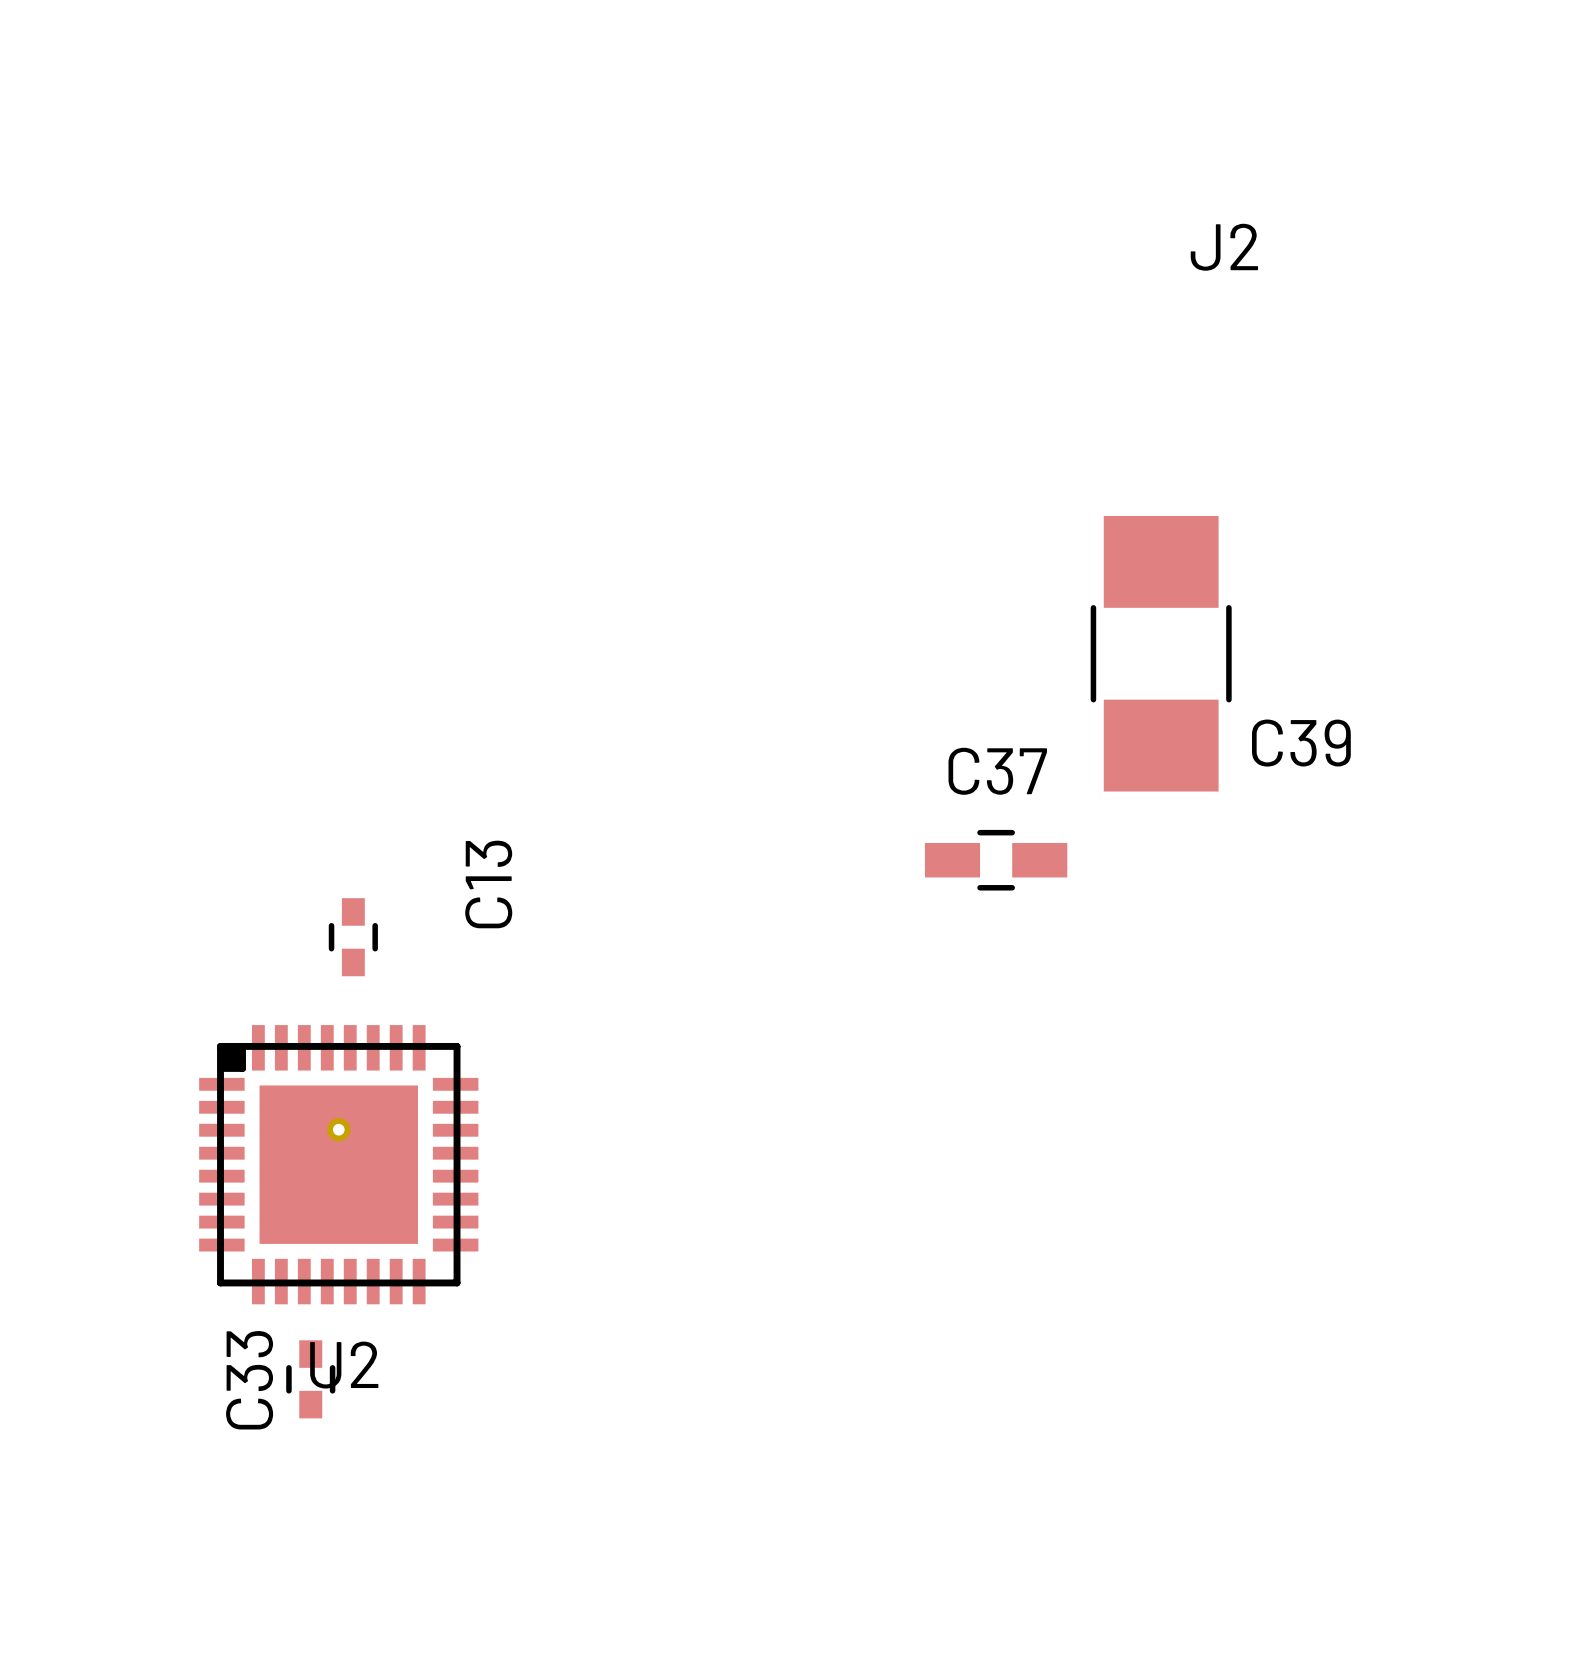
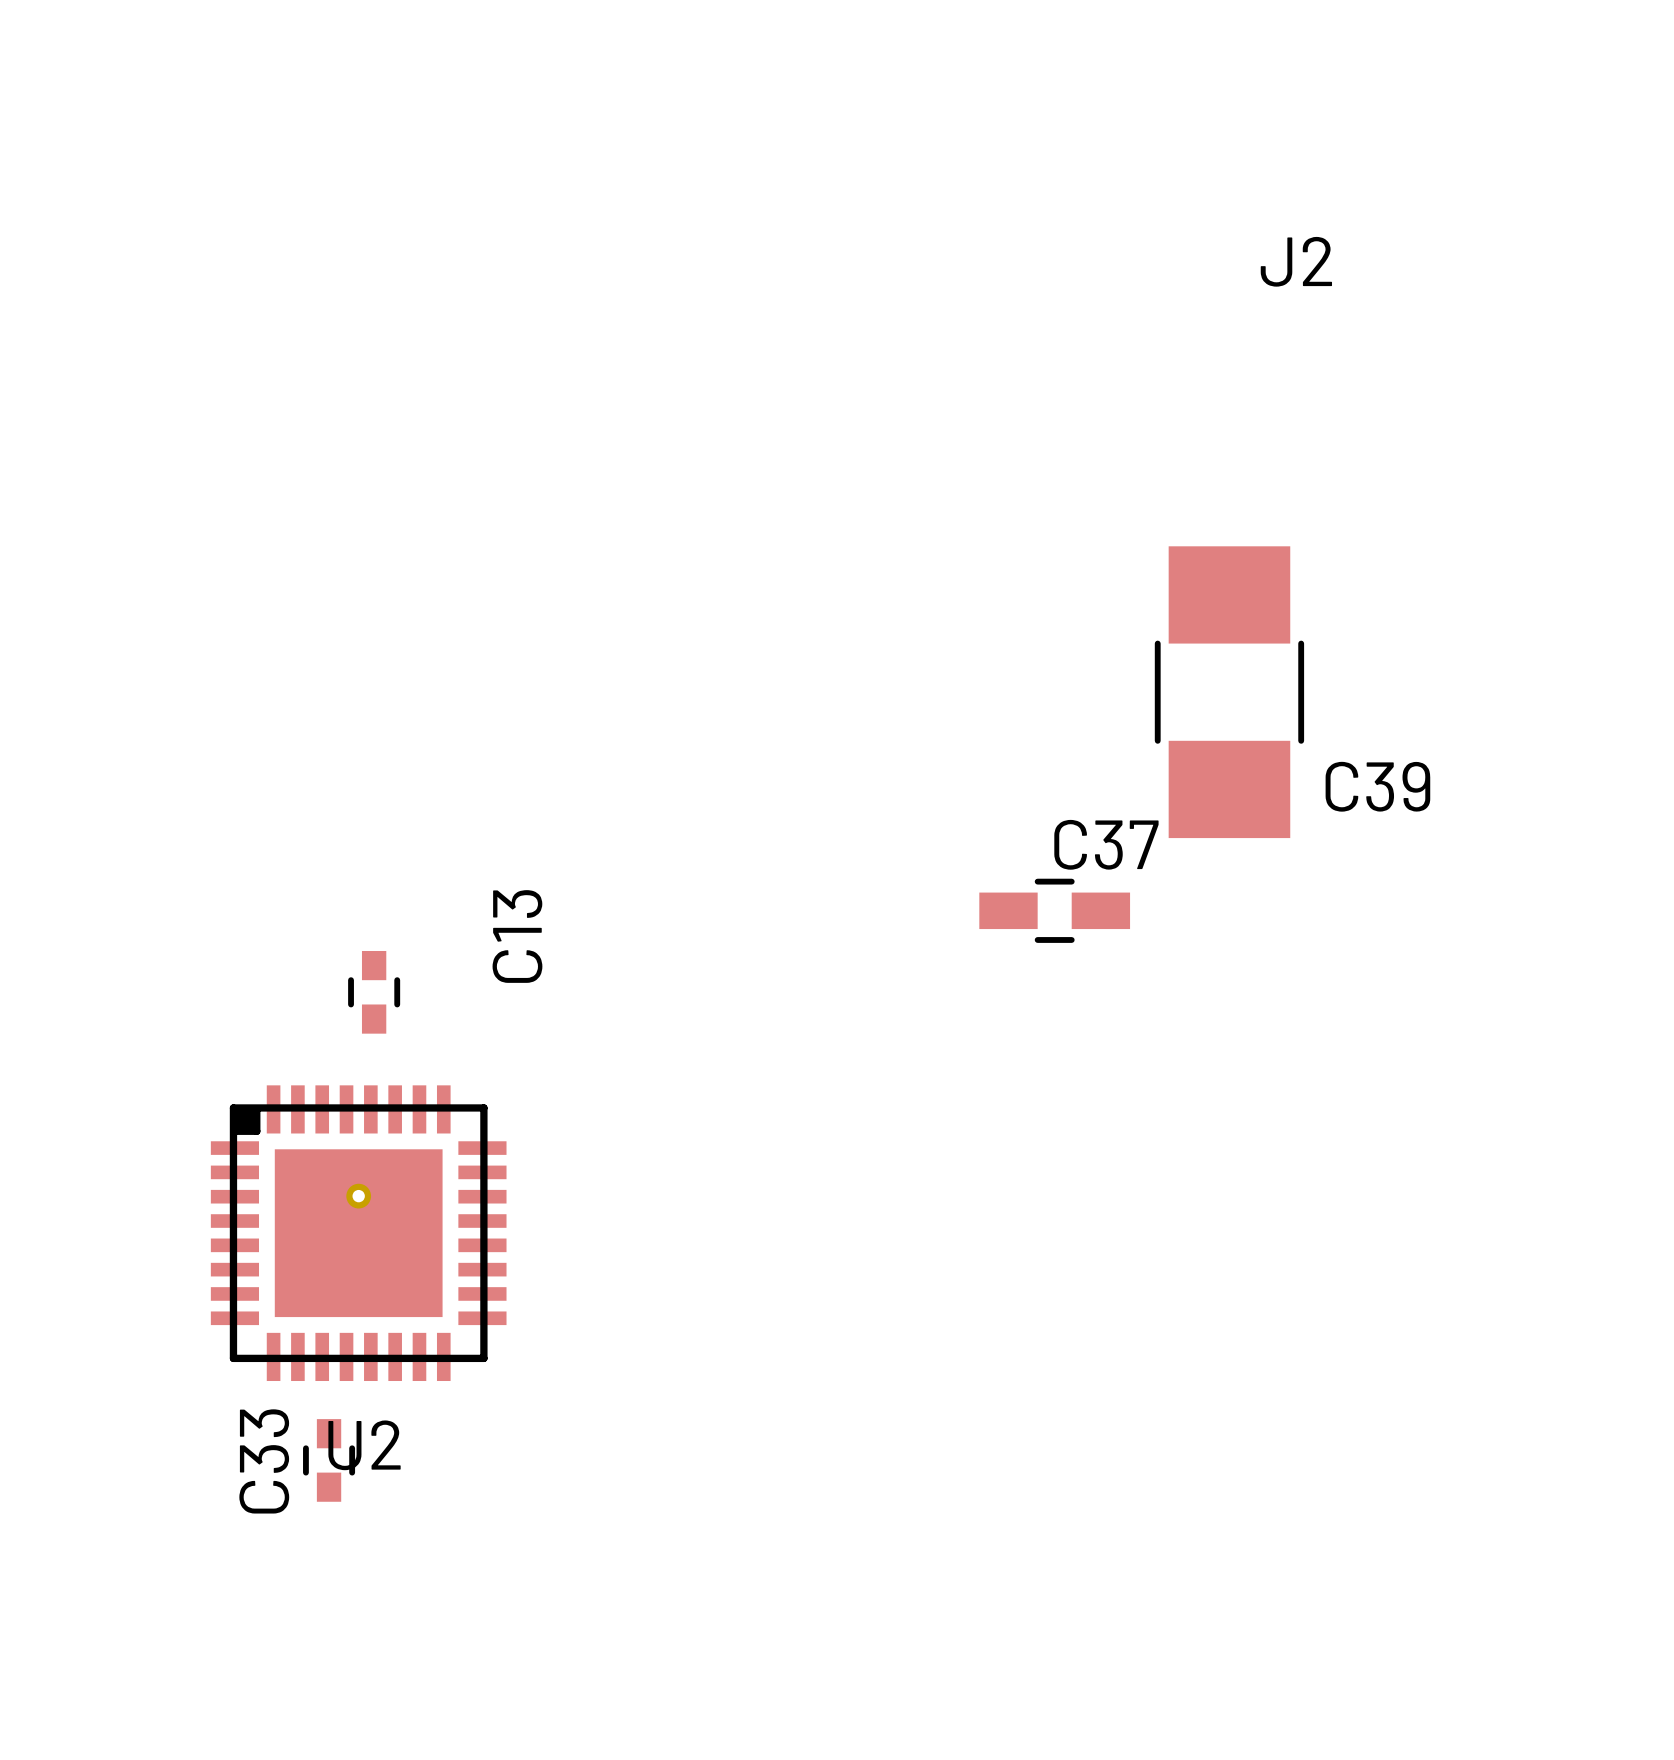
C37 name position: C37 (997, 771) -> C37 (1106, 844)

